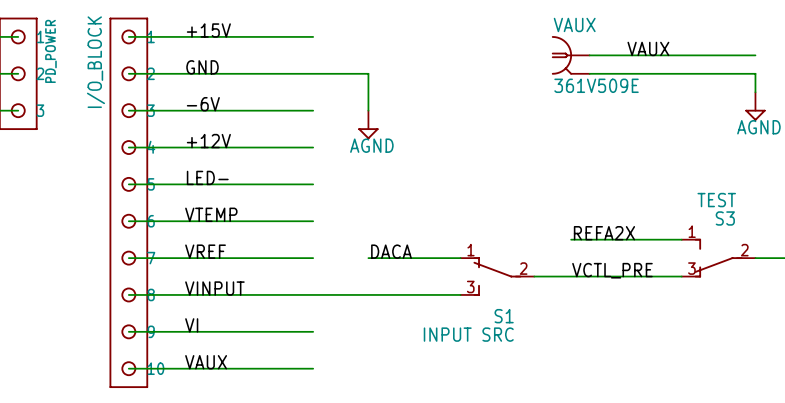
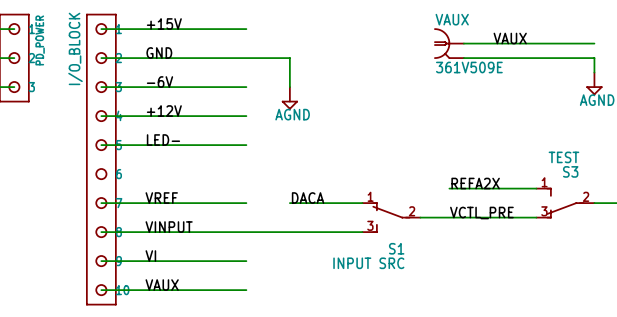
label: VTEMP (211, 214) -> none
wire: (128, 221) (313, 221) -> none

